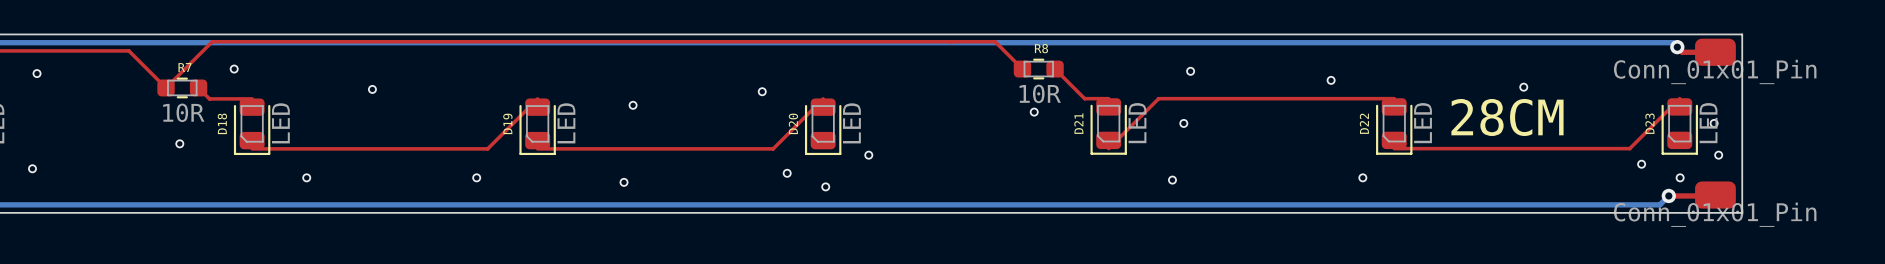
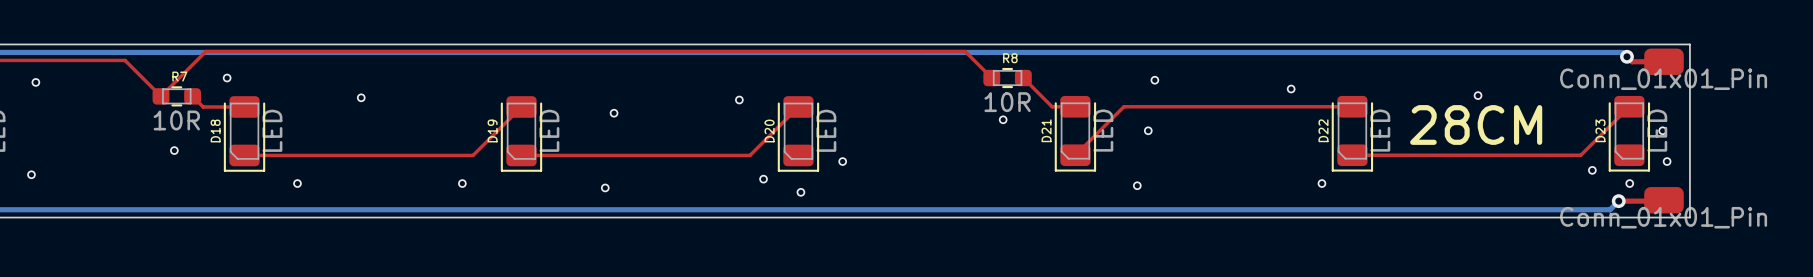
D18 footprint: [233, 98, 271, 156] -> [223, 96, 266, 172]
D19 footprint: [519, 98, 556, 156] -> [500, 96, 543, 172]
D20 footprint: [804, 98, 842, 156] -> [777, 96, 820, 172]
D21 footprint: [1090, 98, 1127, 155] -> [1054, 95, 1097, 172]
D22 footprint: [1376, 98, 1413, 155] -> [1331, 95, 1374, 172]
D23 footprint: [1661, 98, 1698, 155] -> [1608, 95, 1651, 172]

